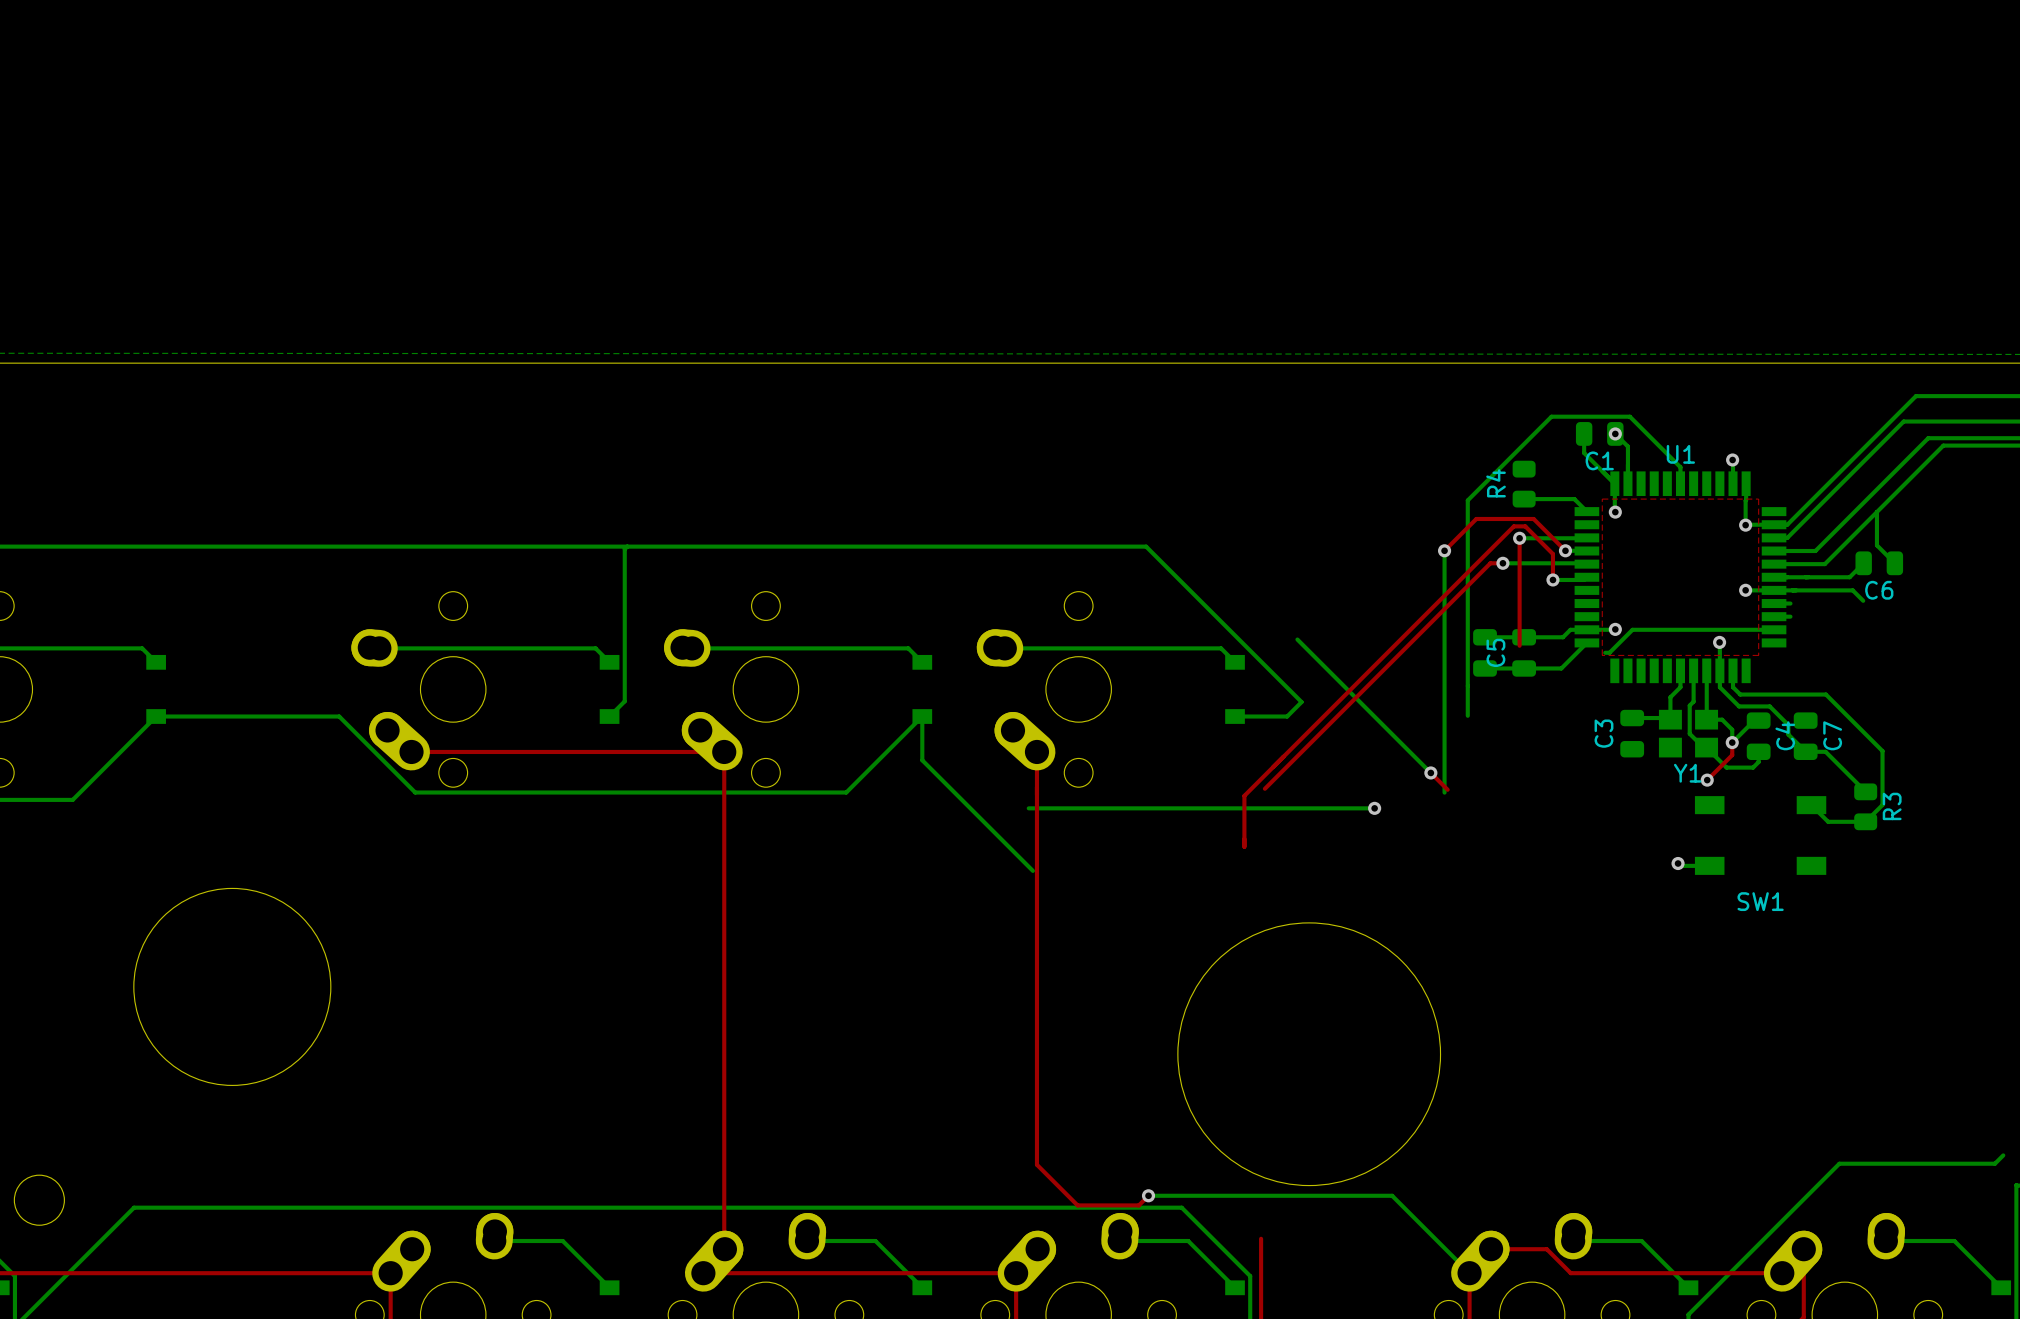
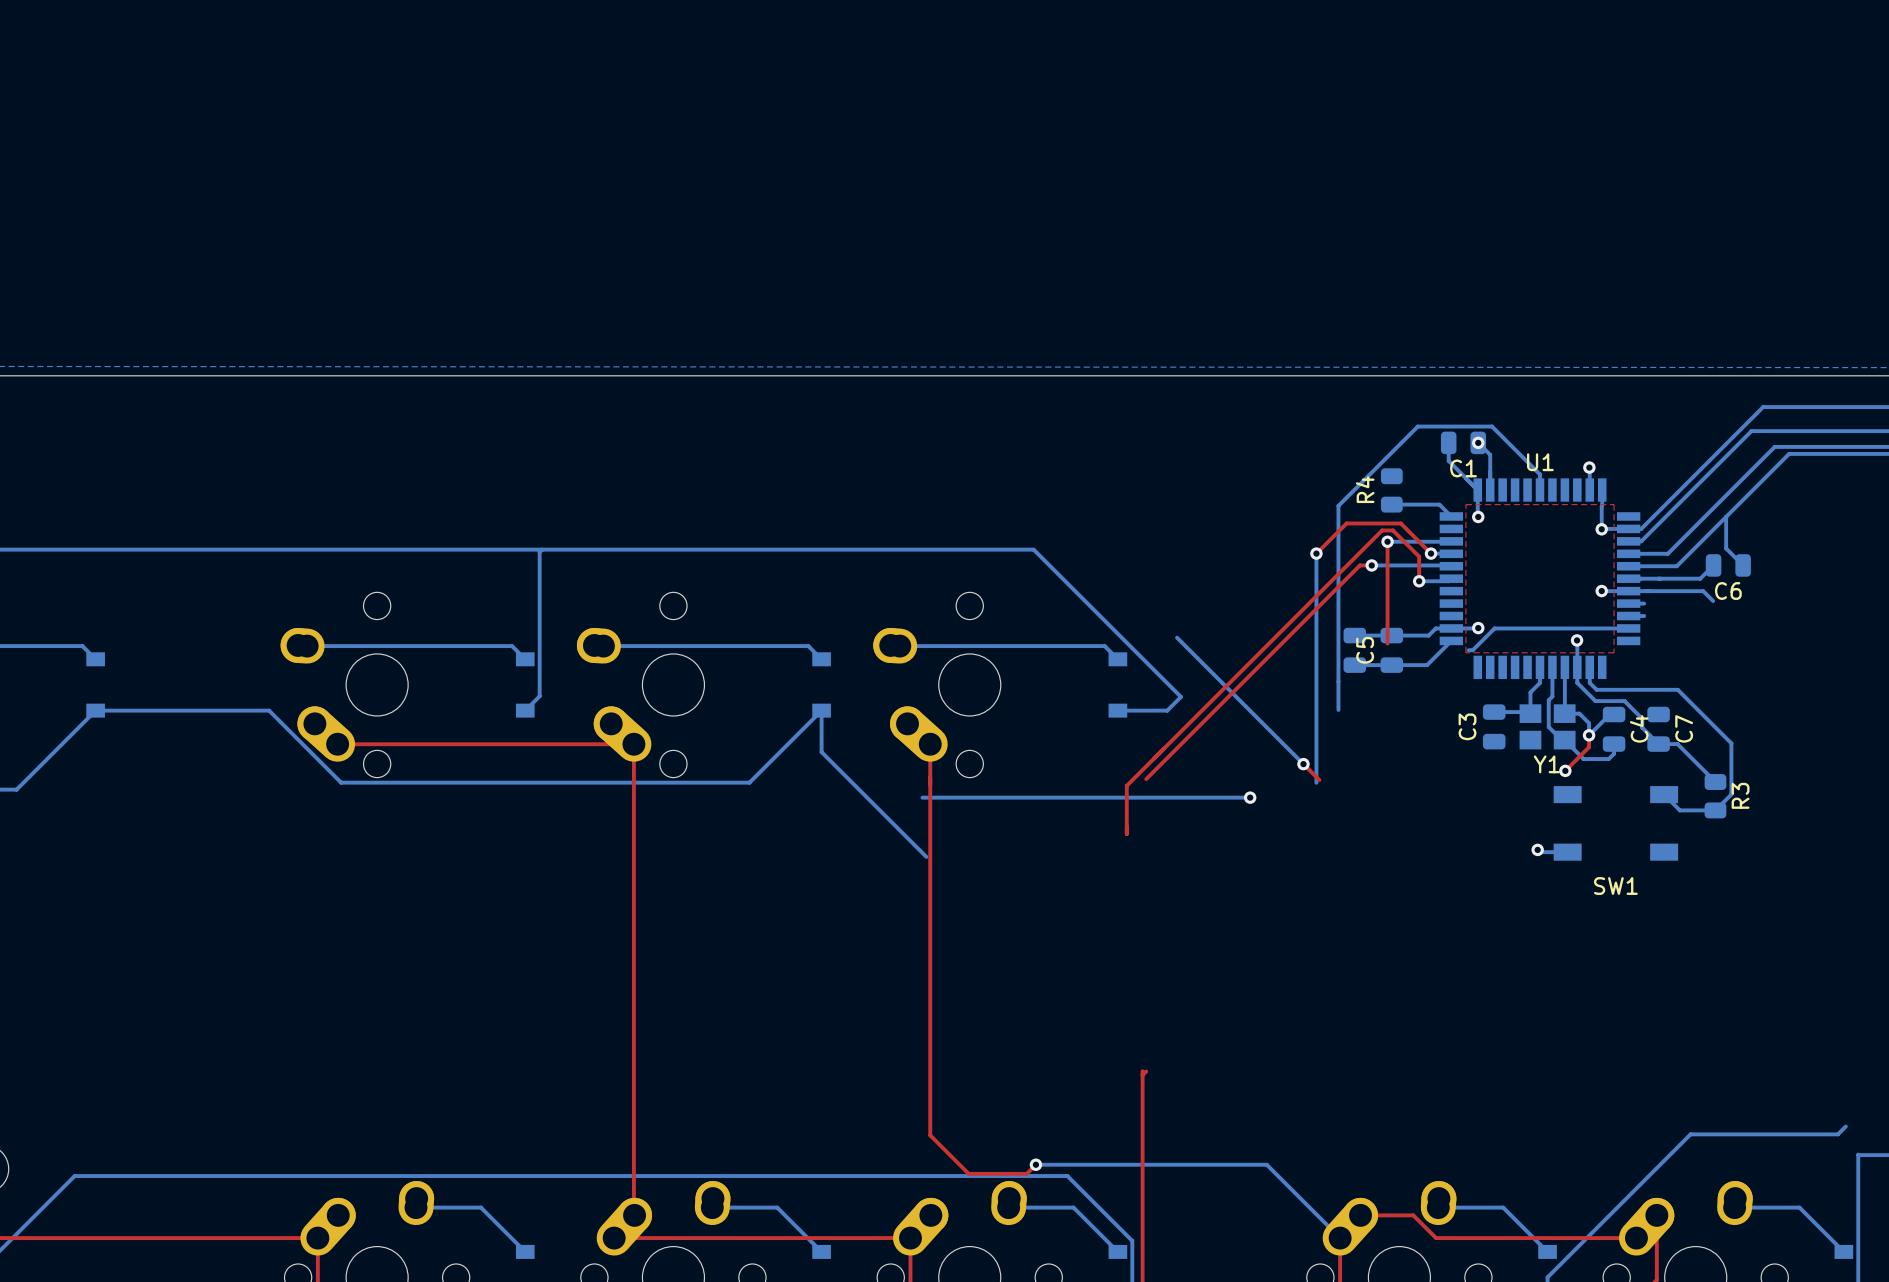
round board edge: [133, 888, 332, 1086] -> none
round board edge: [1177, 922, 1441, 1186] -> none
top track: none -> (1142, 1071) (1142, 1205)
top track: none -> (1146, 1071) (1142, 1075)

